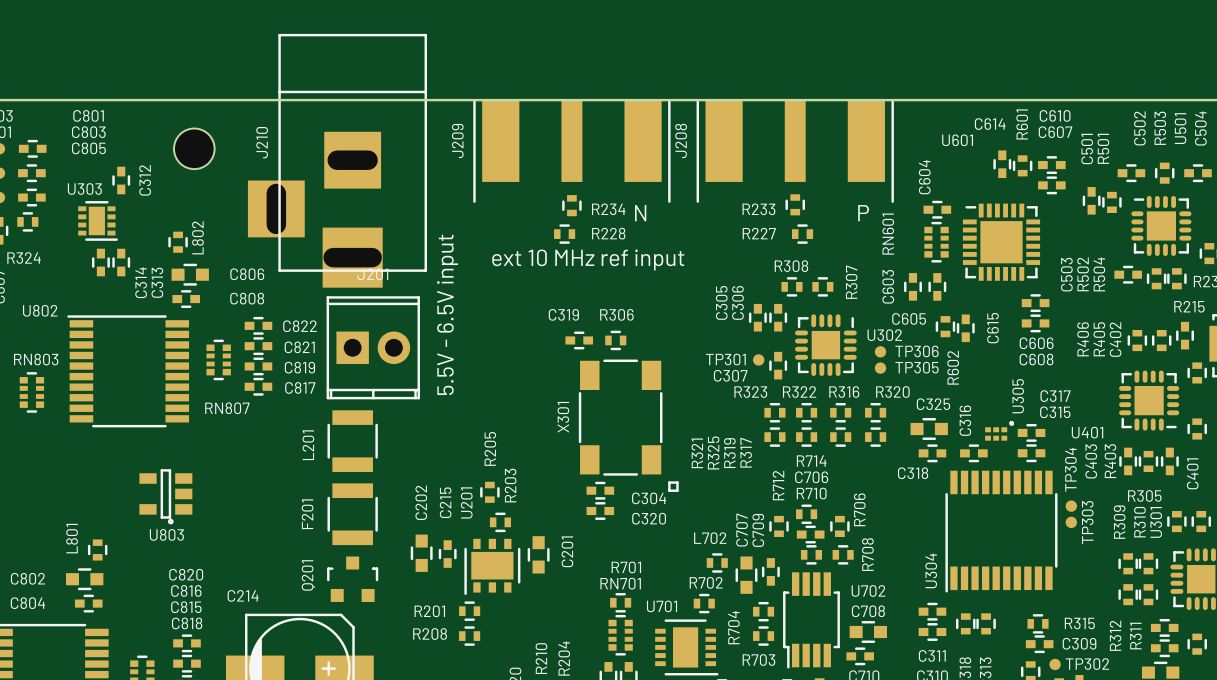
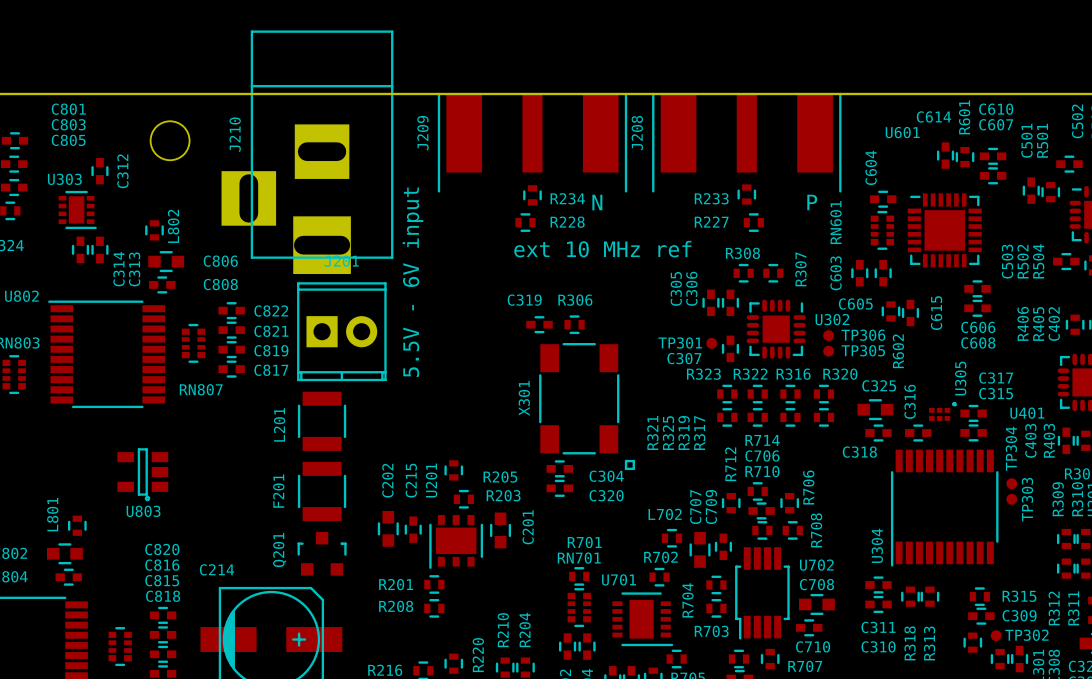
text: ext 10 MHz ref input (588, 259) -> ext 10 MHz ref (602, 249)
text: 5.5V - 6.5V input (447, 314) -> 5.5V - 6V input (412, 282)
R205 name rotation: 0° (490, 448) -> 90° clockwise (500, 477)
R205 name position: R205 (490, 448) -> R205 (500, 477)
R203 name rotation: 0° (510, 485) -> 90° clockwise (503, 495)

